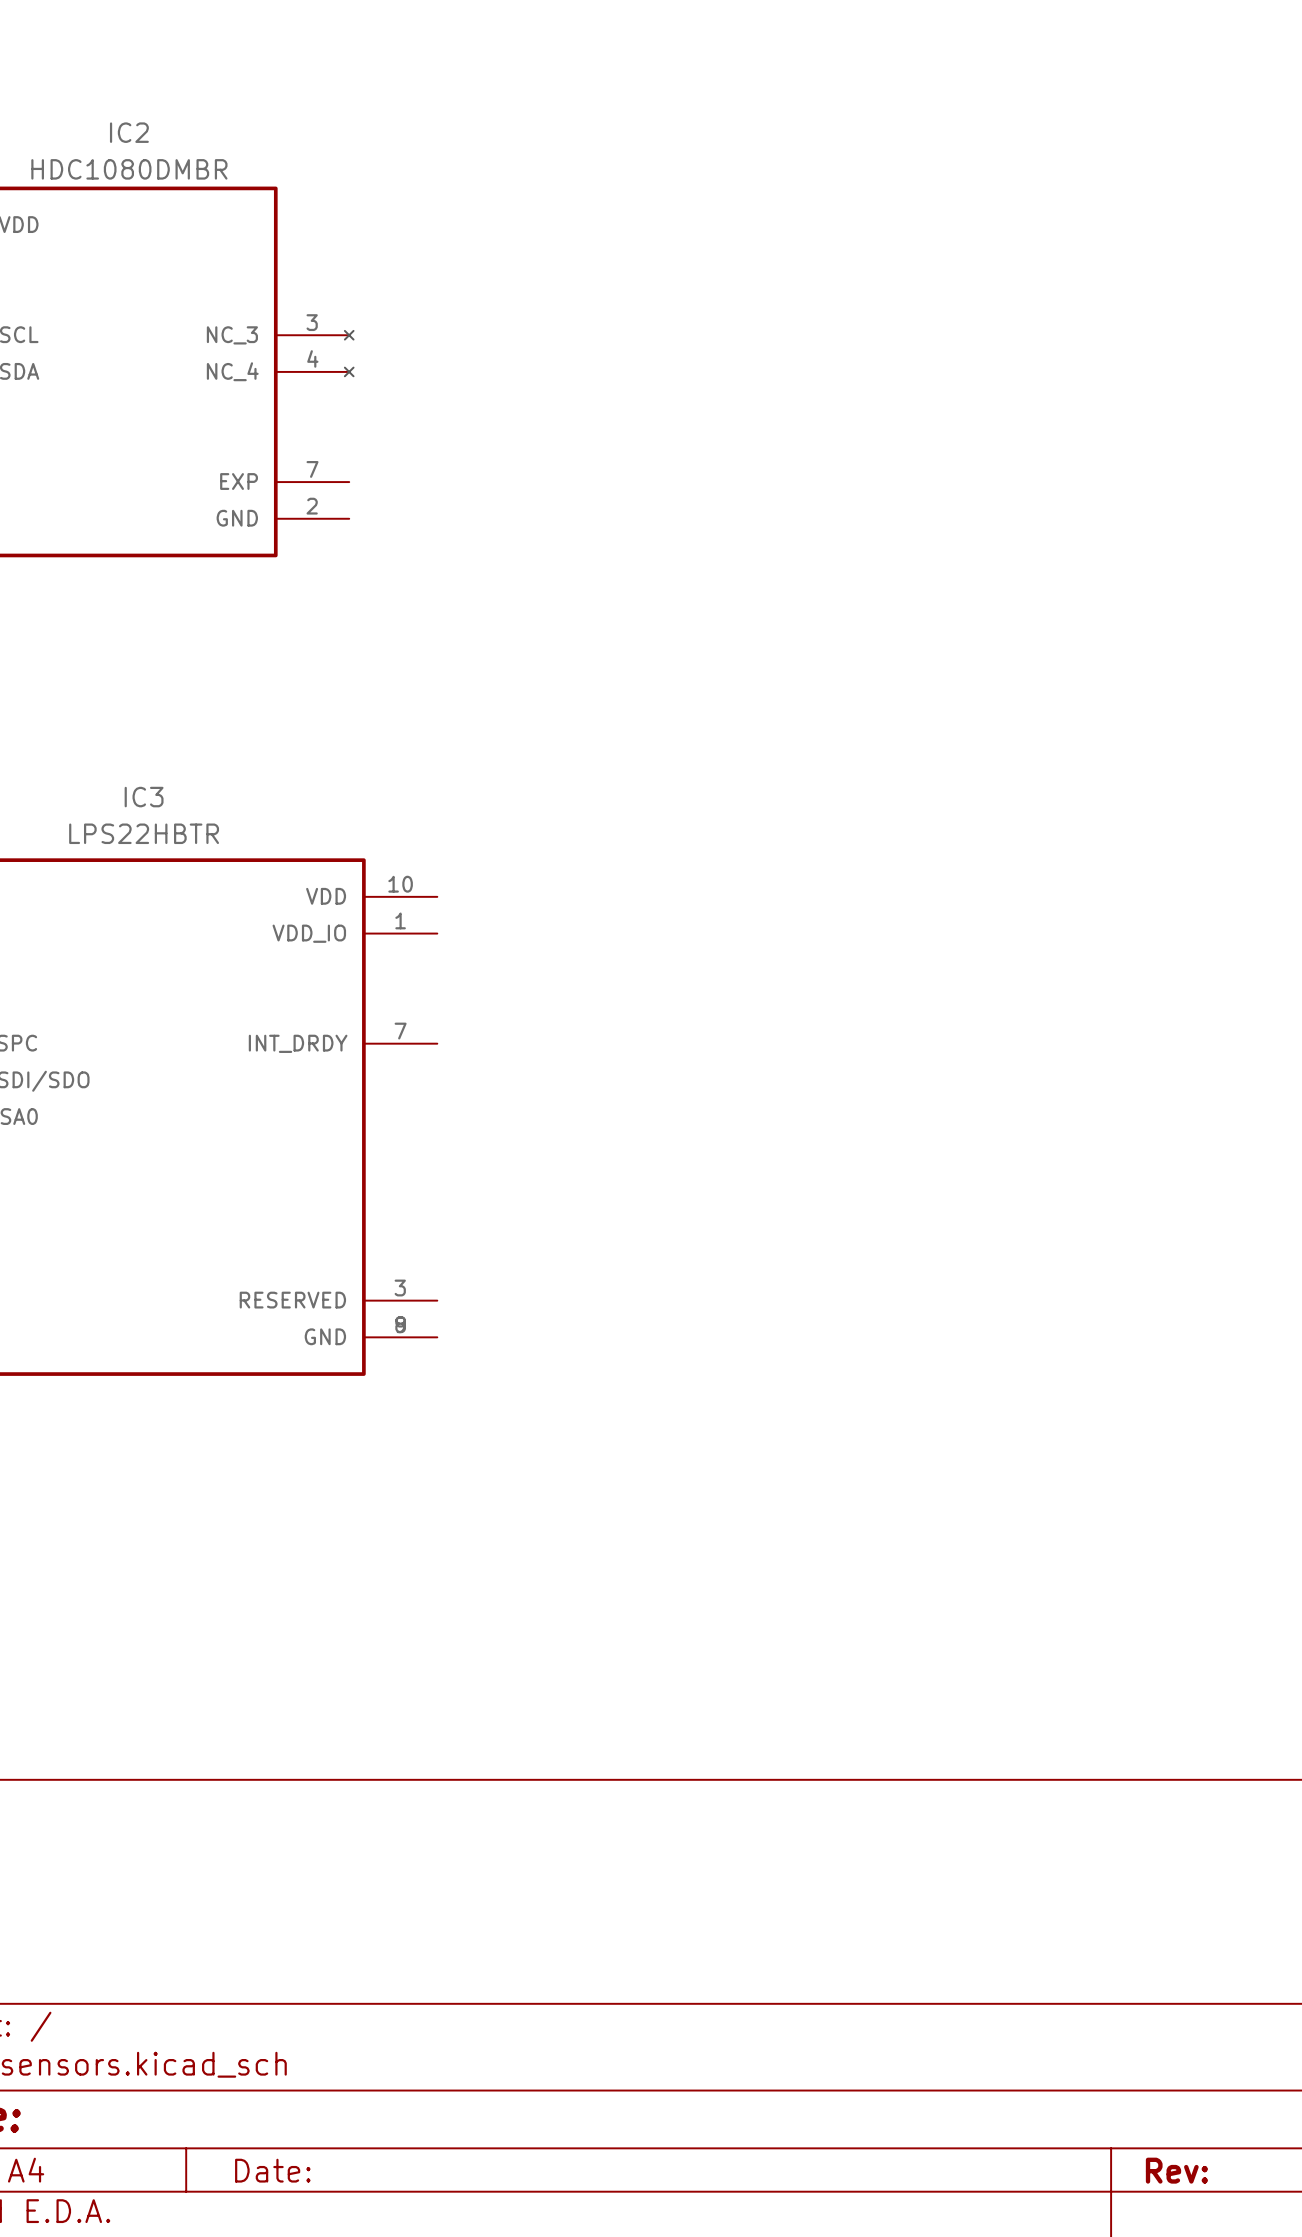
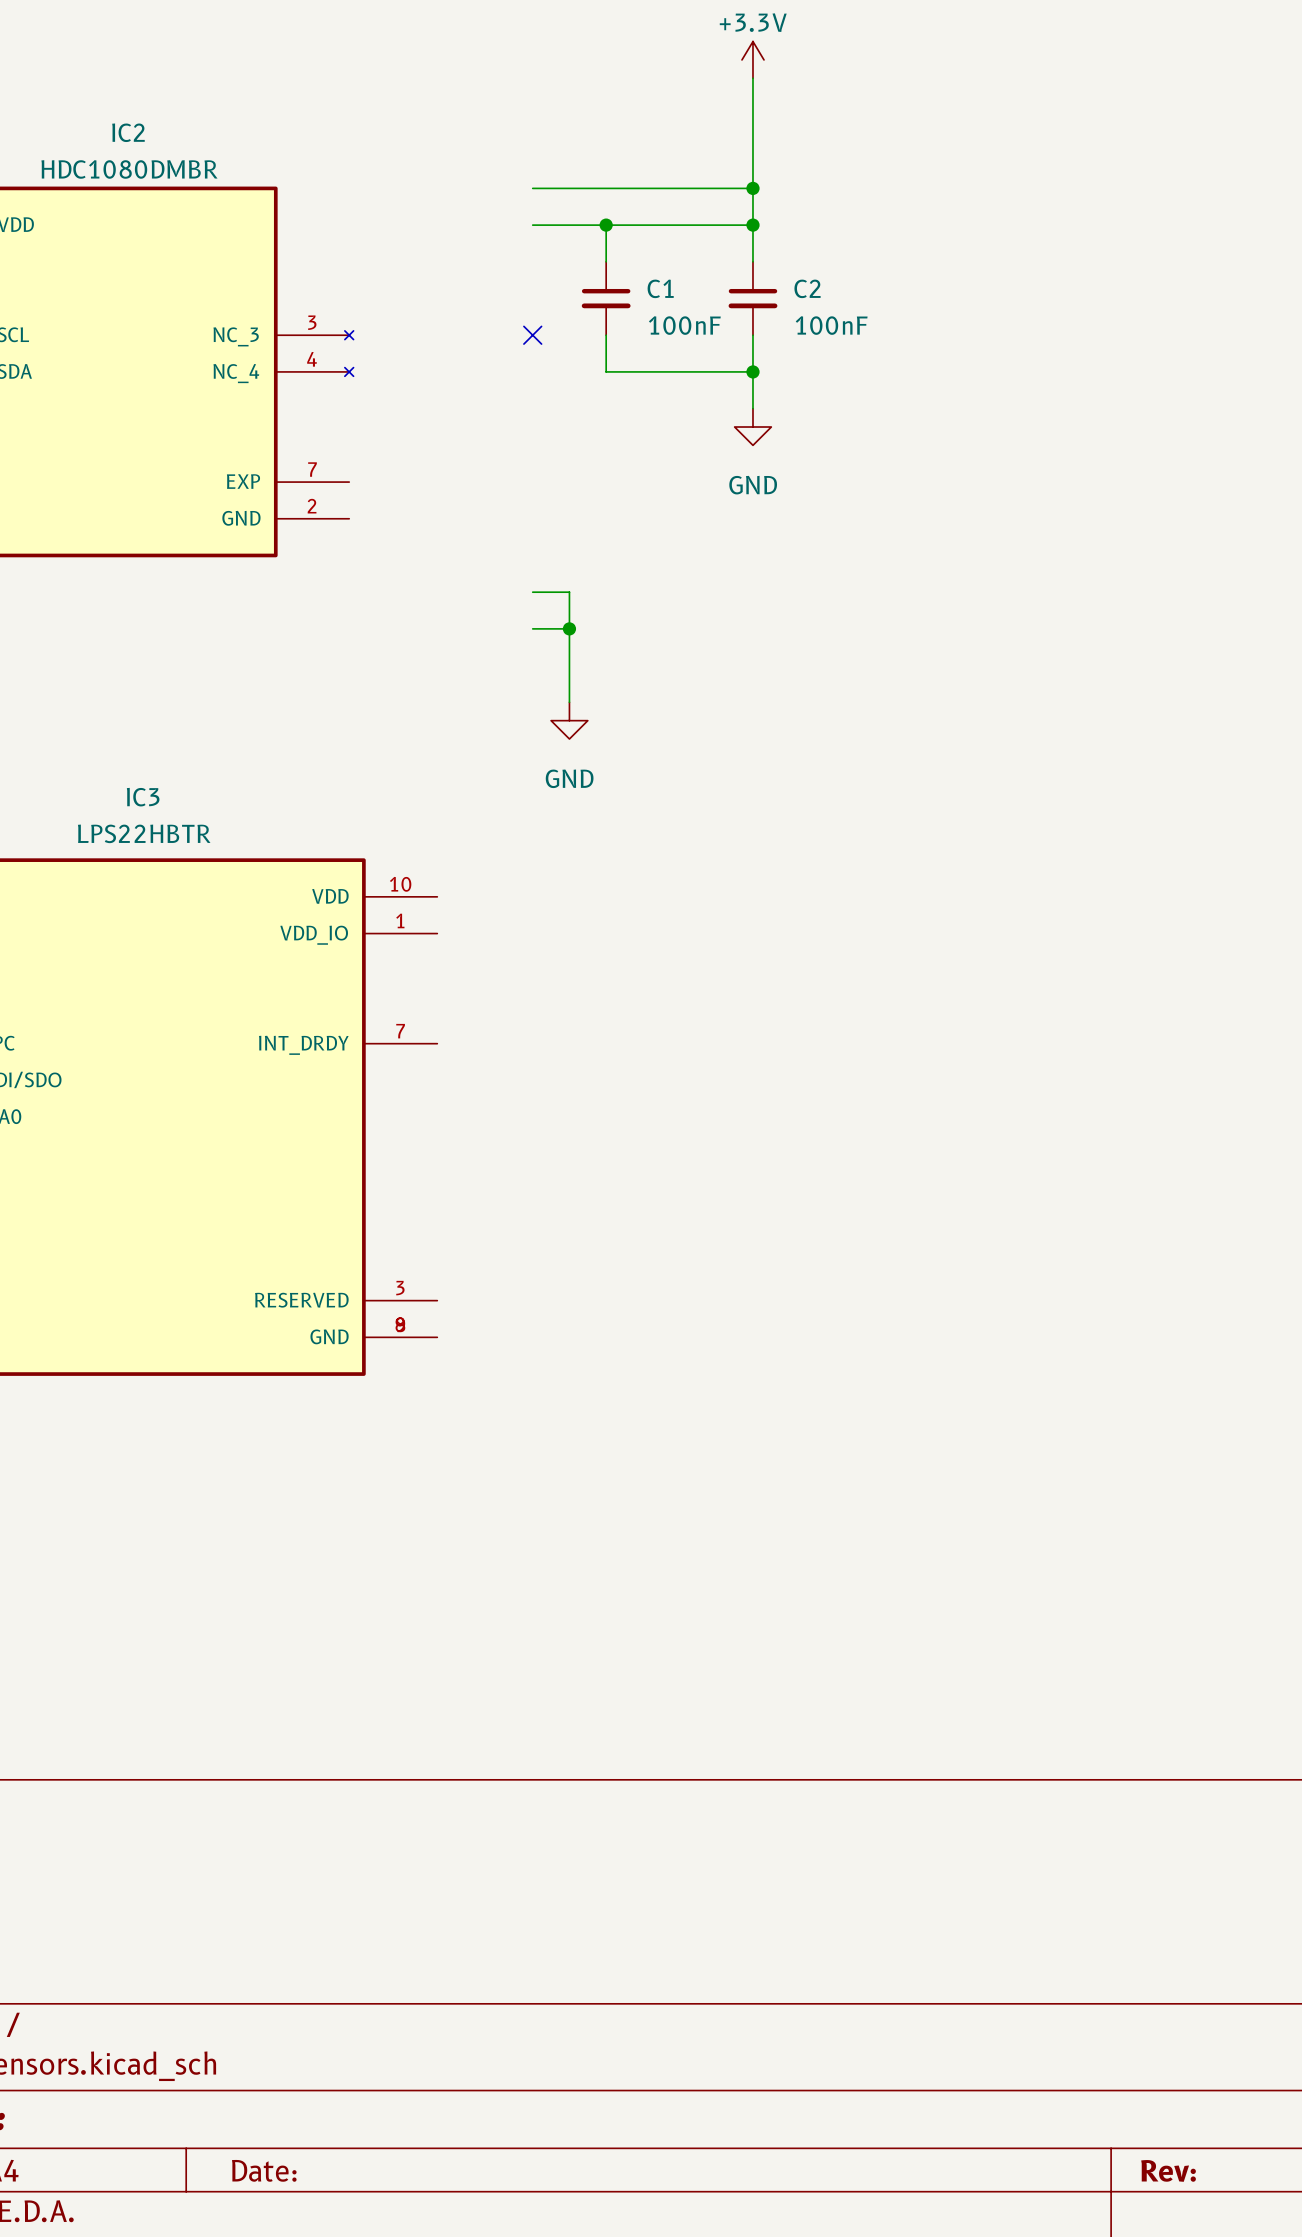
power symbol: none -> +3.3V (752, 59)
wire: none -> (752, 78) (752, 261)
wire: none -> (532, 188) (752, 188)
junction: none -> (752, 188)
wire: none -> (532, 225) (752, 225)
wire: none -> (606, 225) (606, 261)
junction: none -> (606, 225)
junction: none -> (752, 225)
C1: none -> 100nF (606, 298)
C2: none -> 100nF (752, 298)
no-connect mark: none -> (532, 335)
wire: none -> (606, 335) (606, 371) (752, 371)
wire: none -> (752, 335) (752, 408)
junction: none -> (752, 371)
power symbol: none -> GND (752, 427)
wire: none -> (532, 592) (569, 592) (569, 702)
wire: none -> (532, 628) (569, 628)
junction: none -> (569, 628)
power symbol: none -> GND (569, 720)

